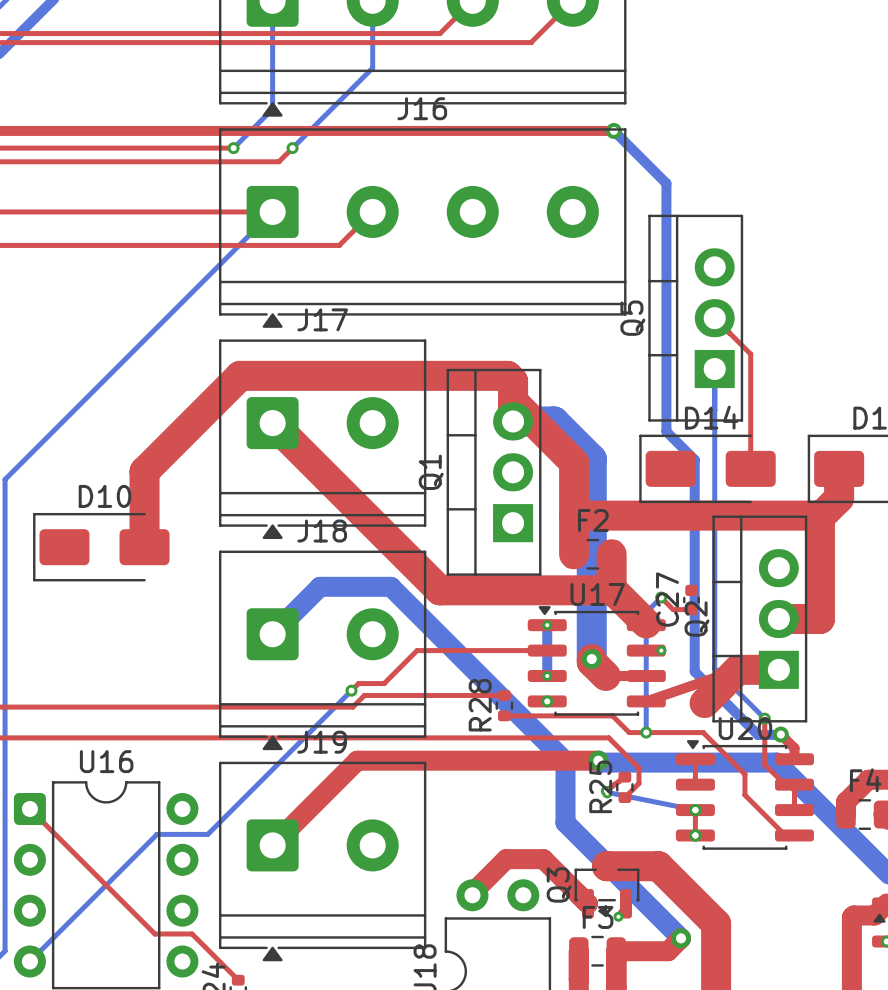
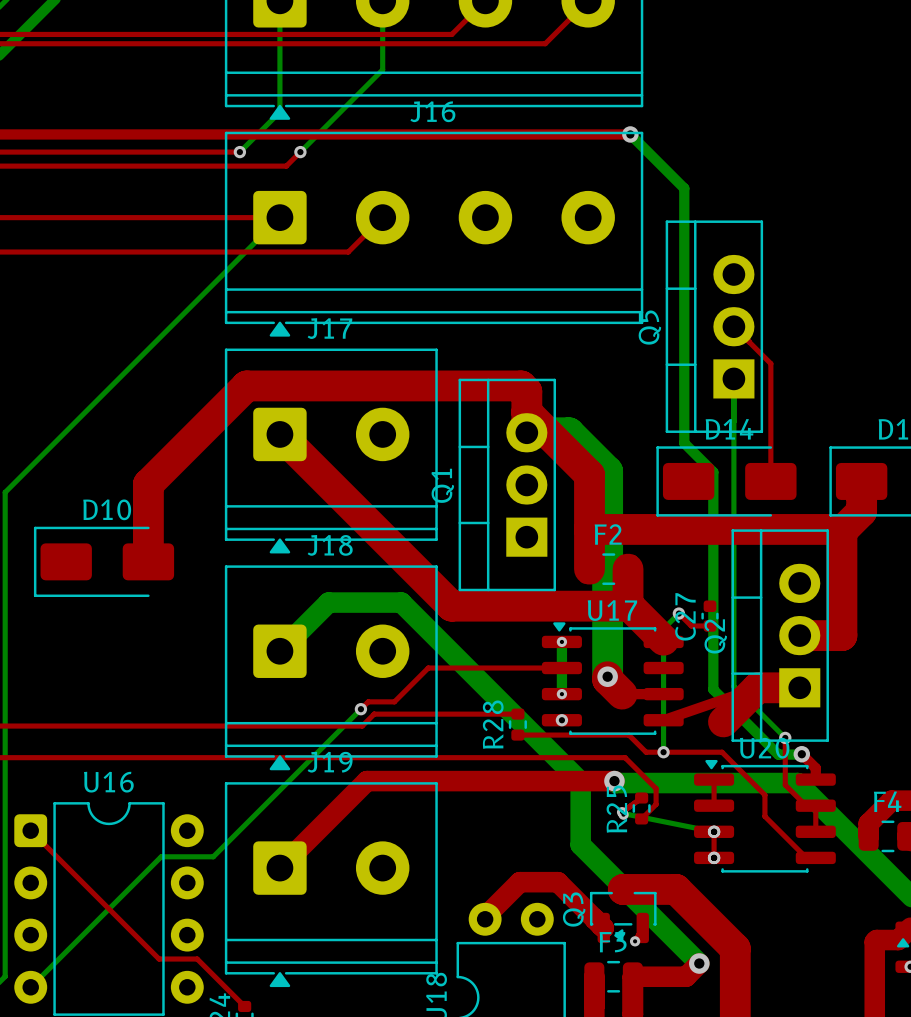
via: (661, 650) -> none

